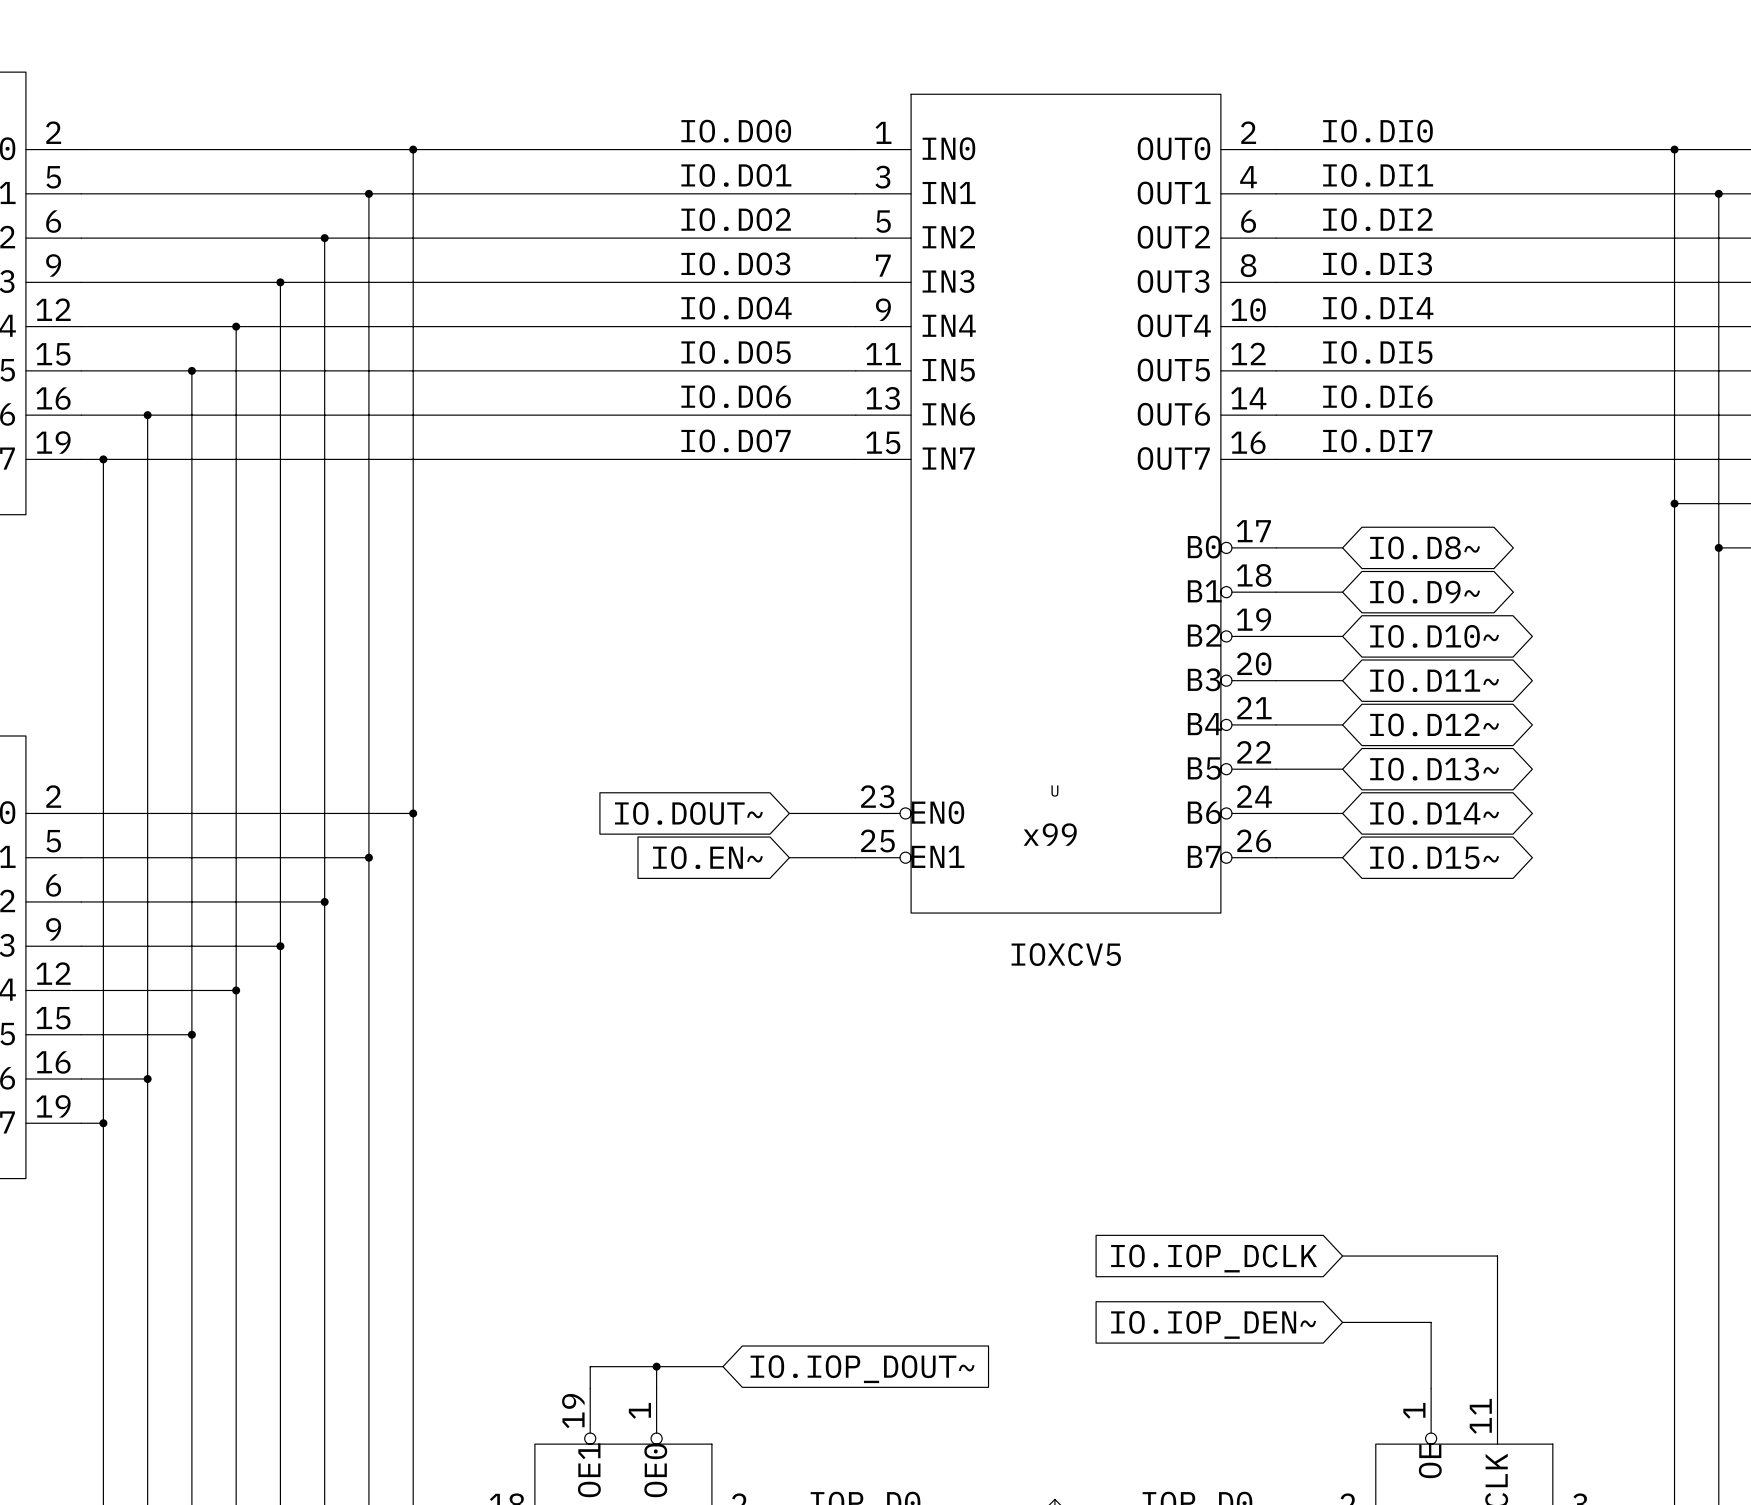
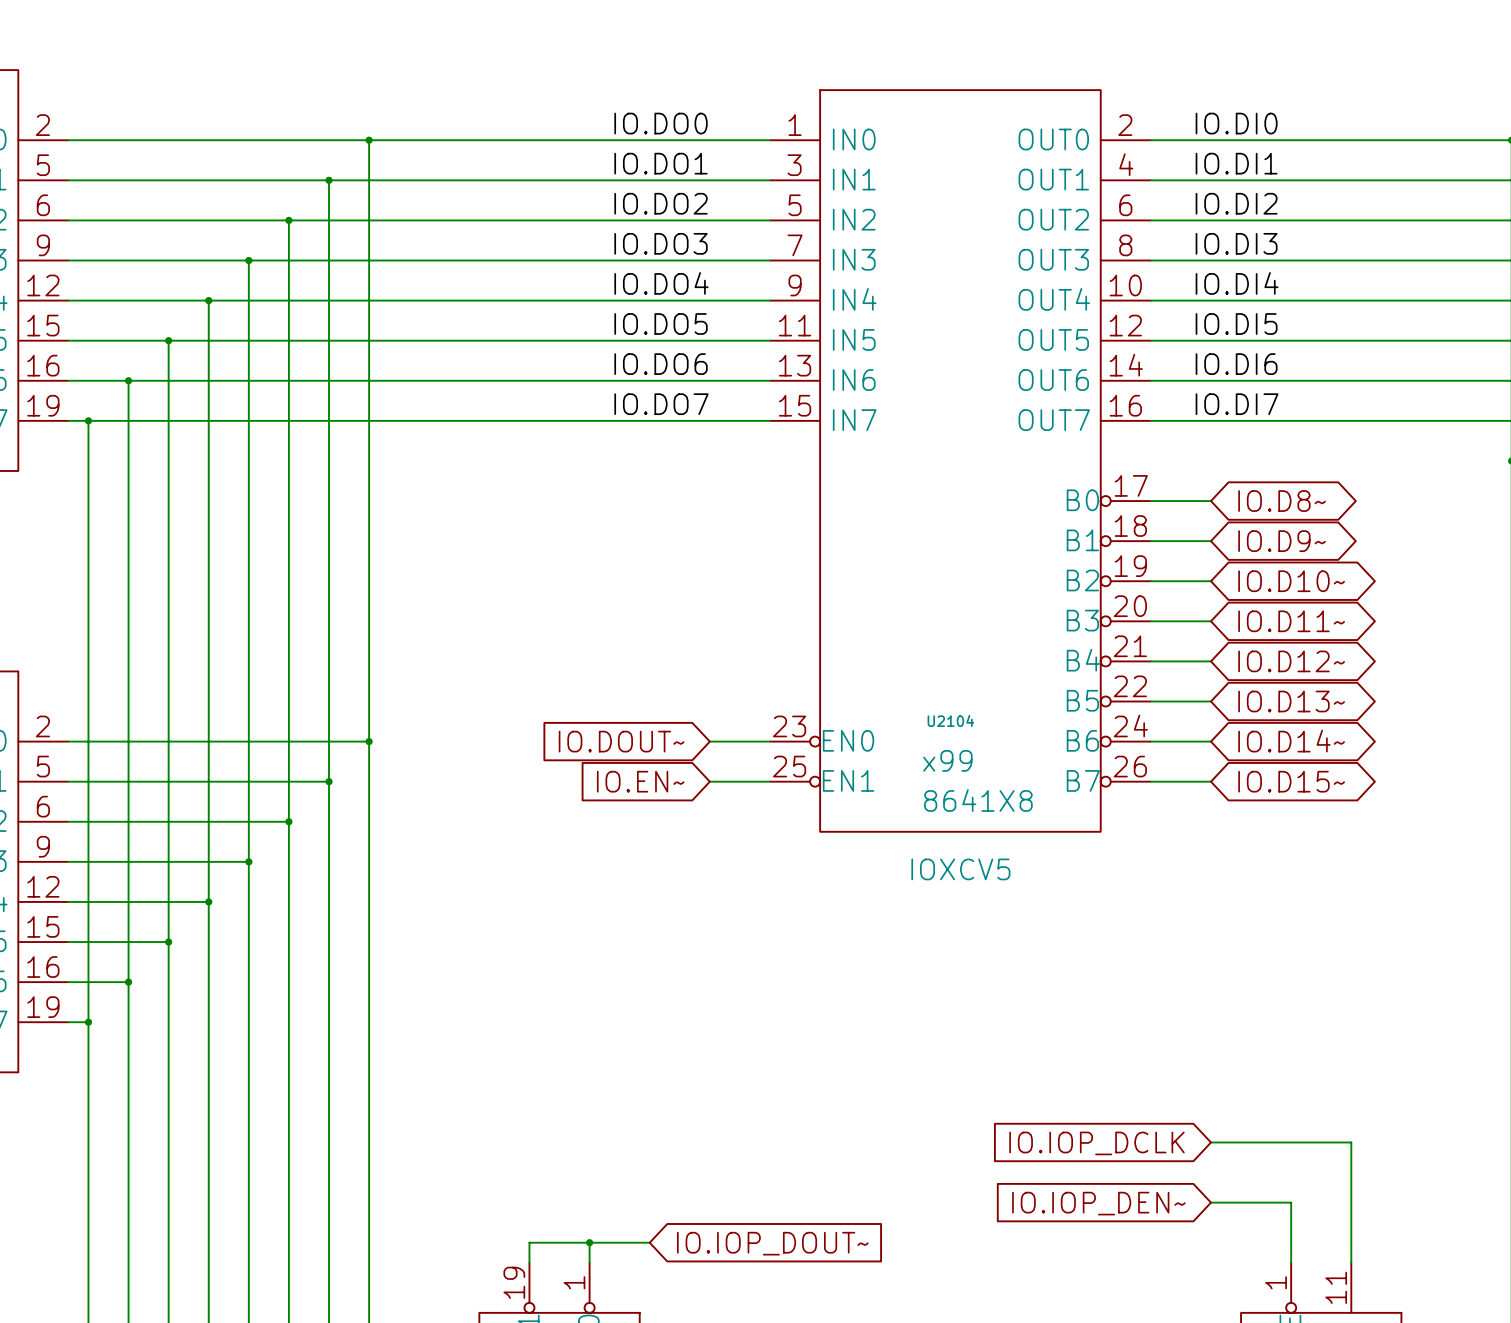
U name: U (1054, 791) -> U2104 (950, 720)
U value: none -> 8641X8 (978, 800)

